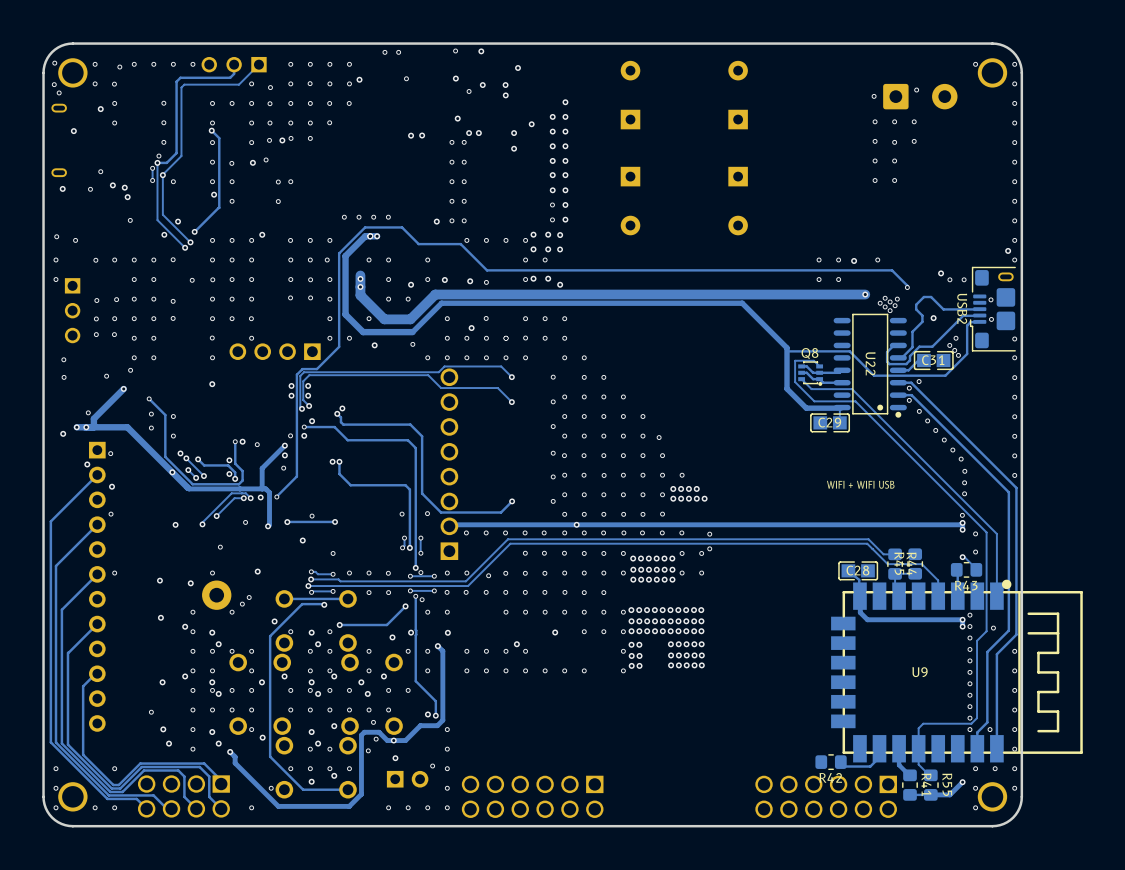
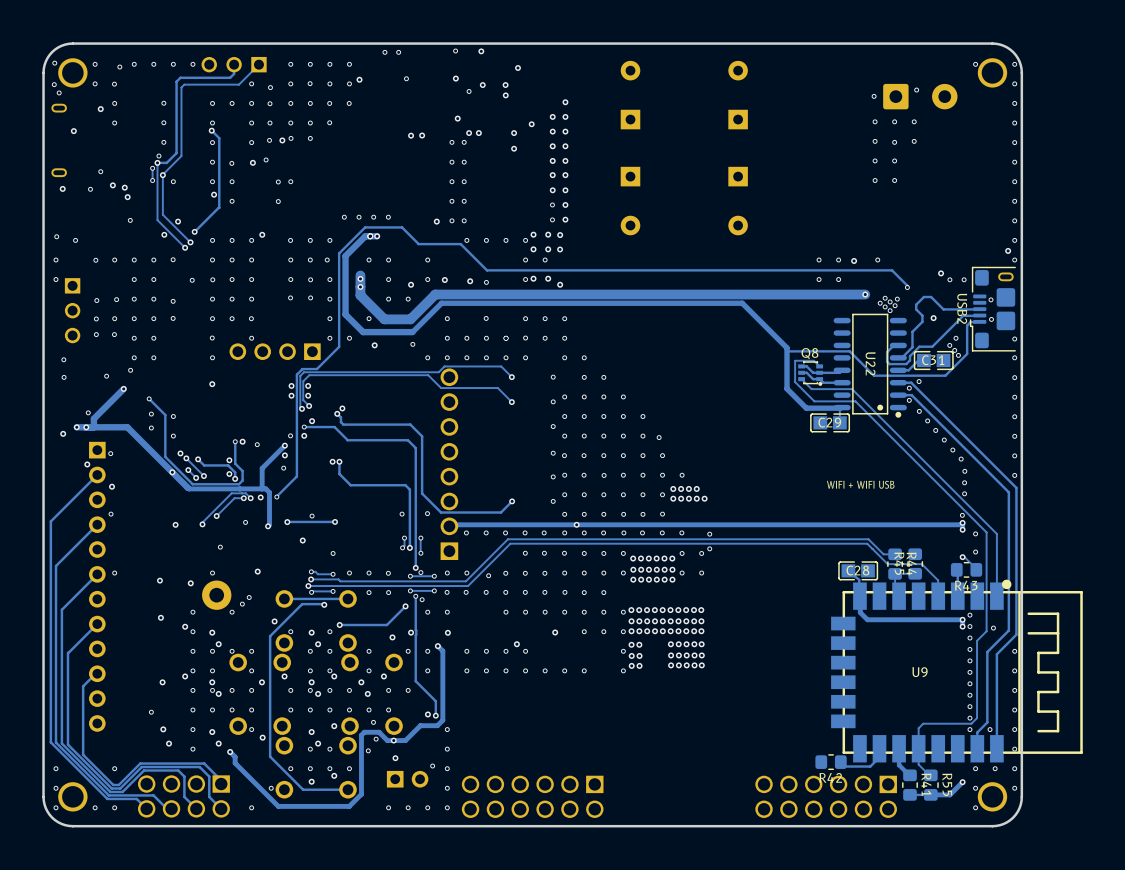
via: (471, 328) -> none

